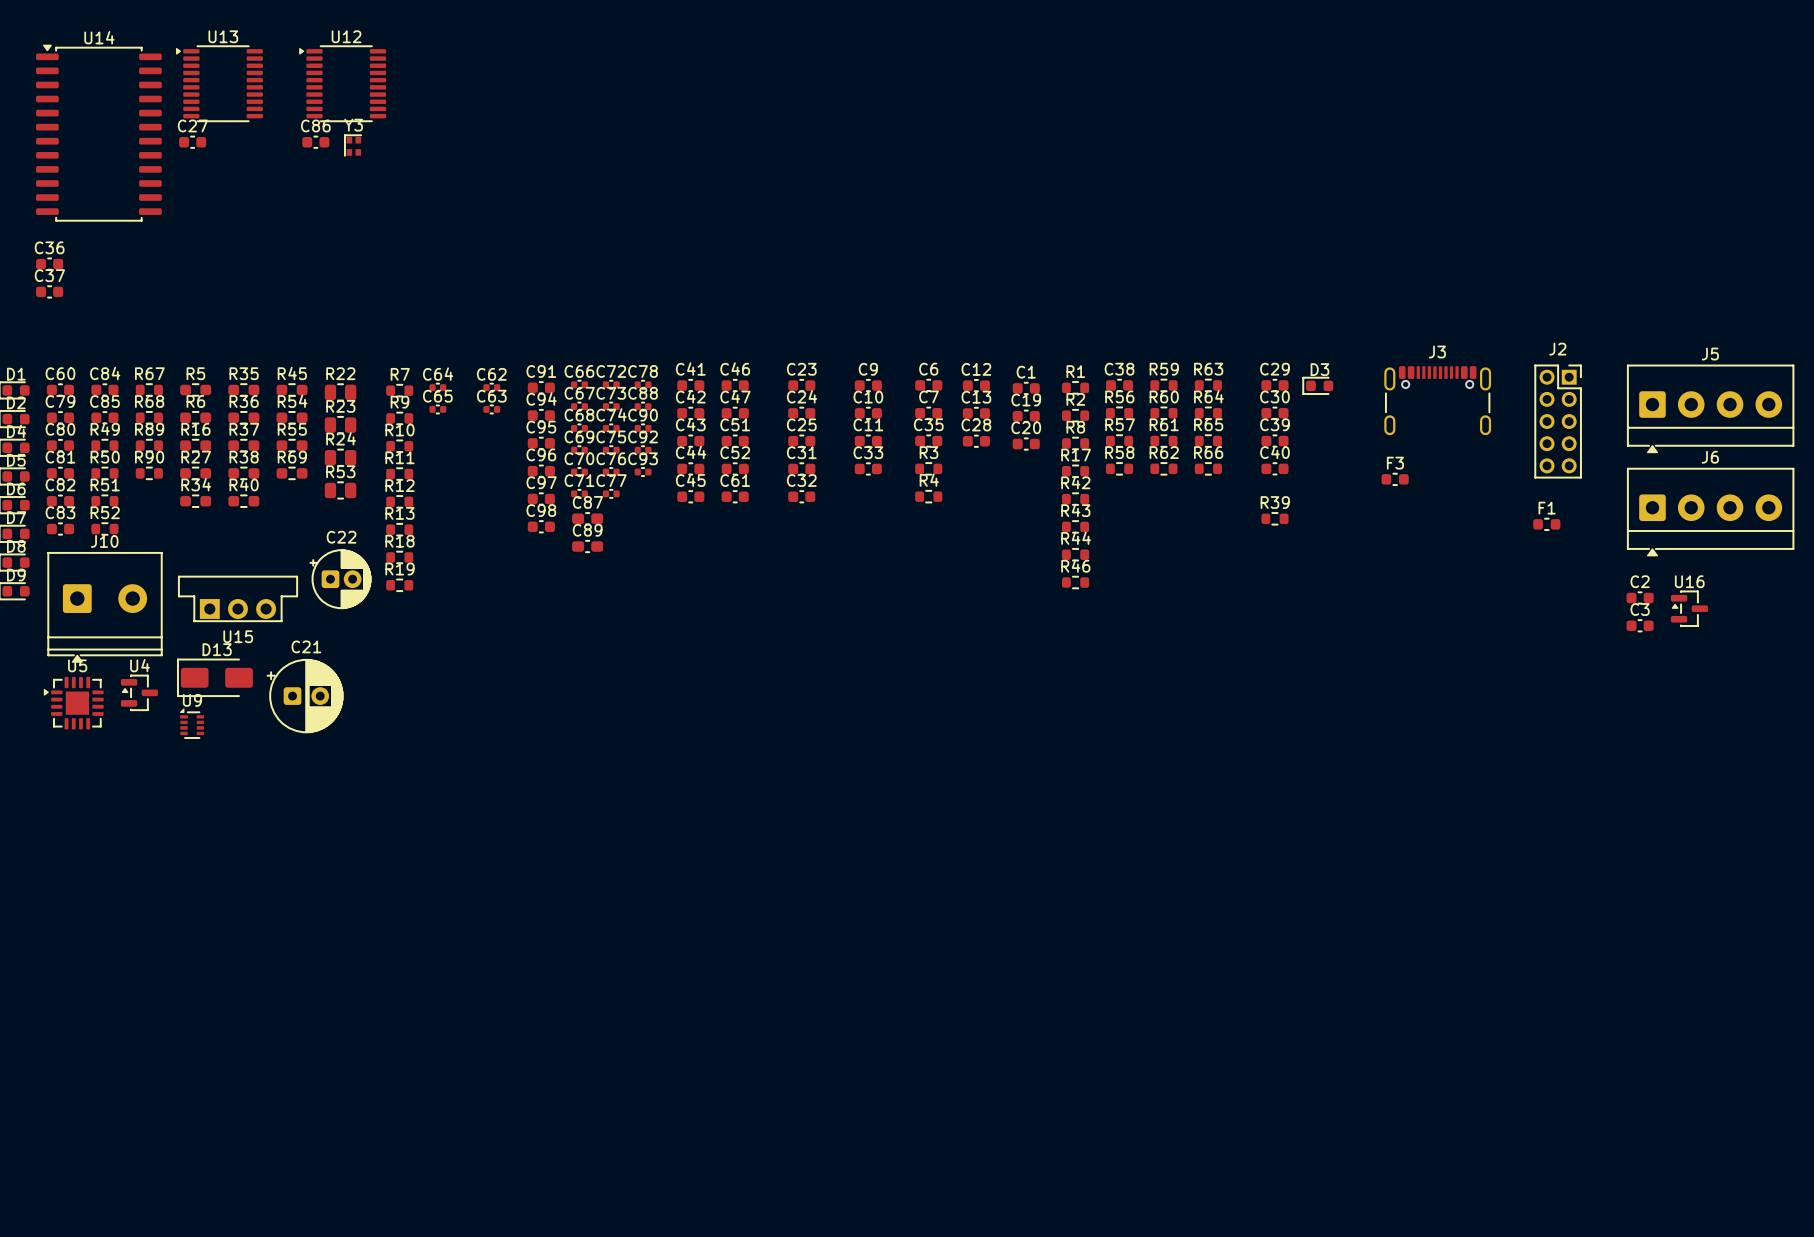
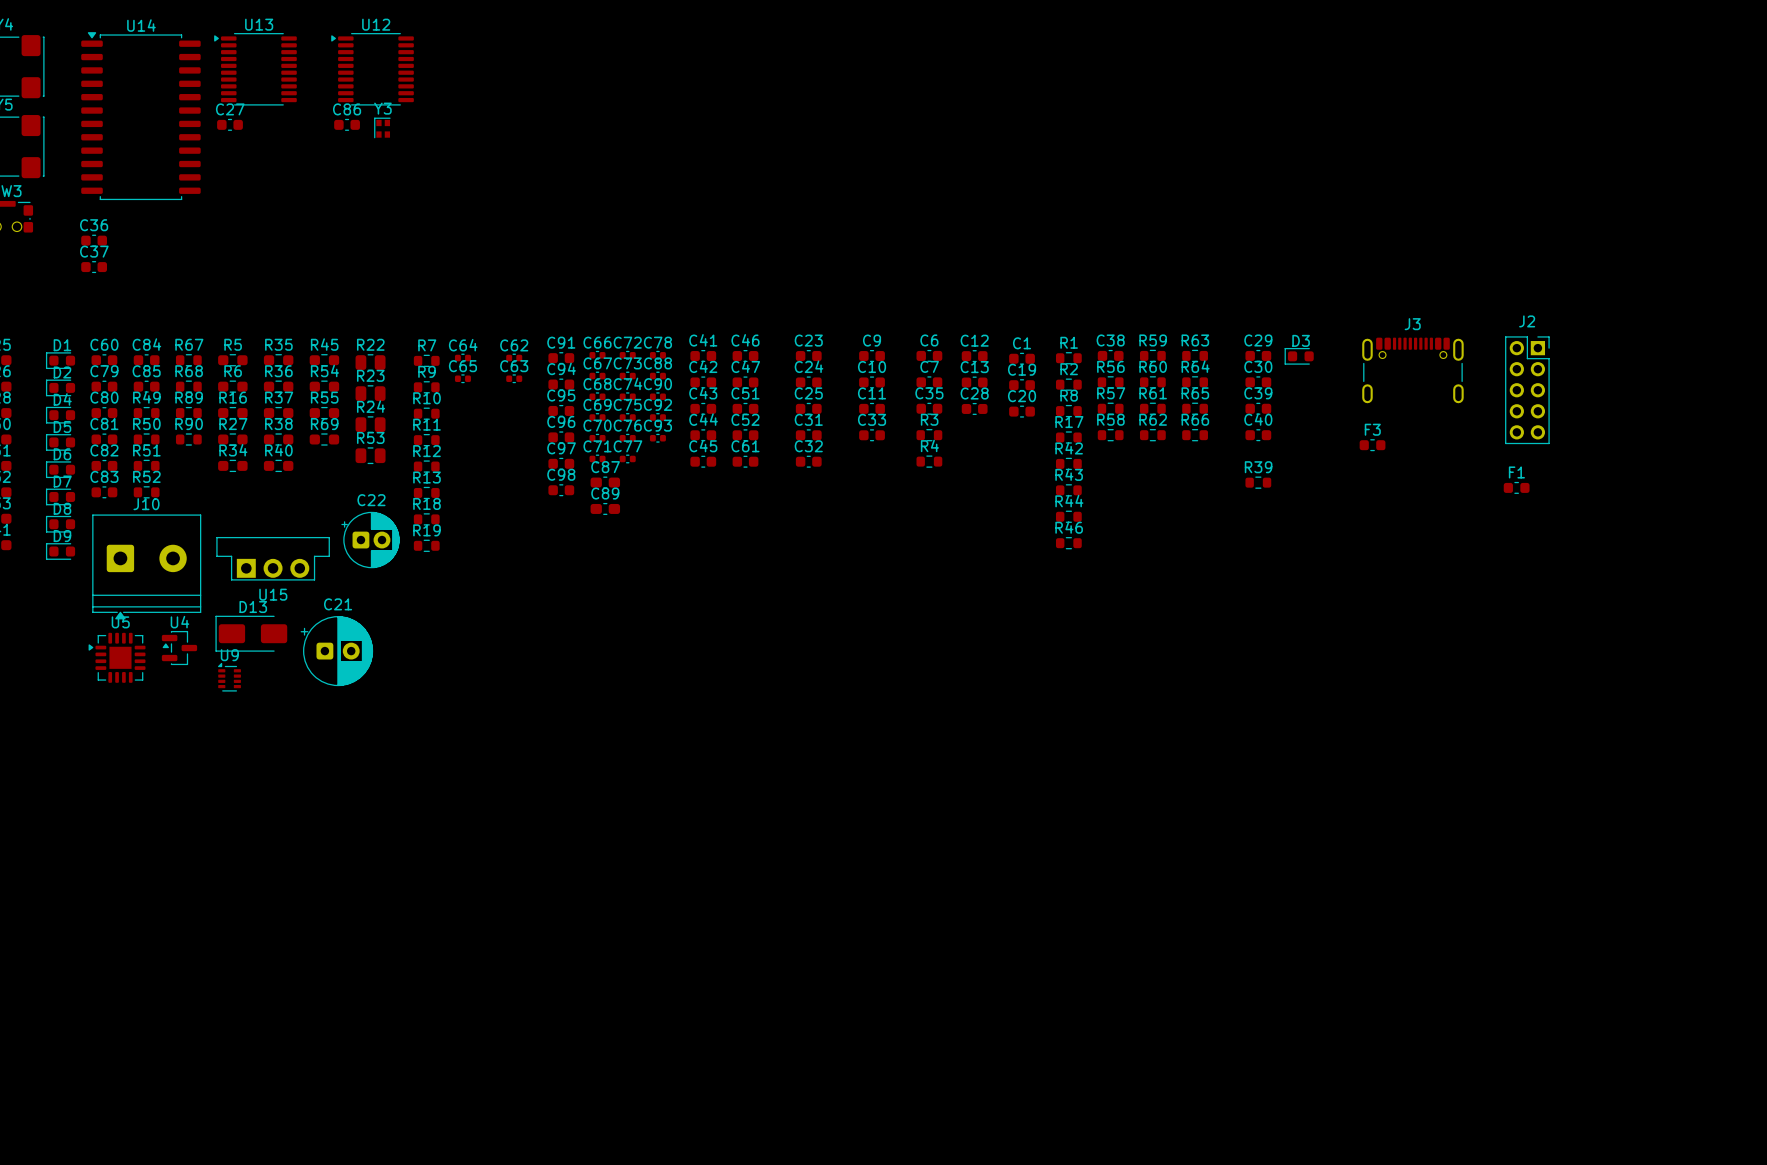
J5: (1710, 409) -> none
J6: (1710, 512) -> none
C2: (1640, 597) -> none
U16: (1689, 608) -> none
C3: (1640, 625) -> none

